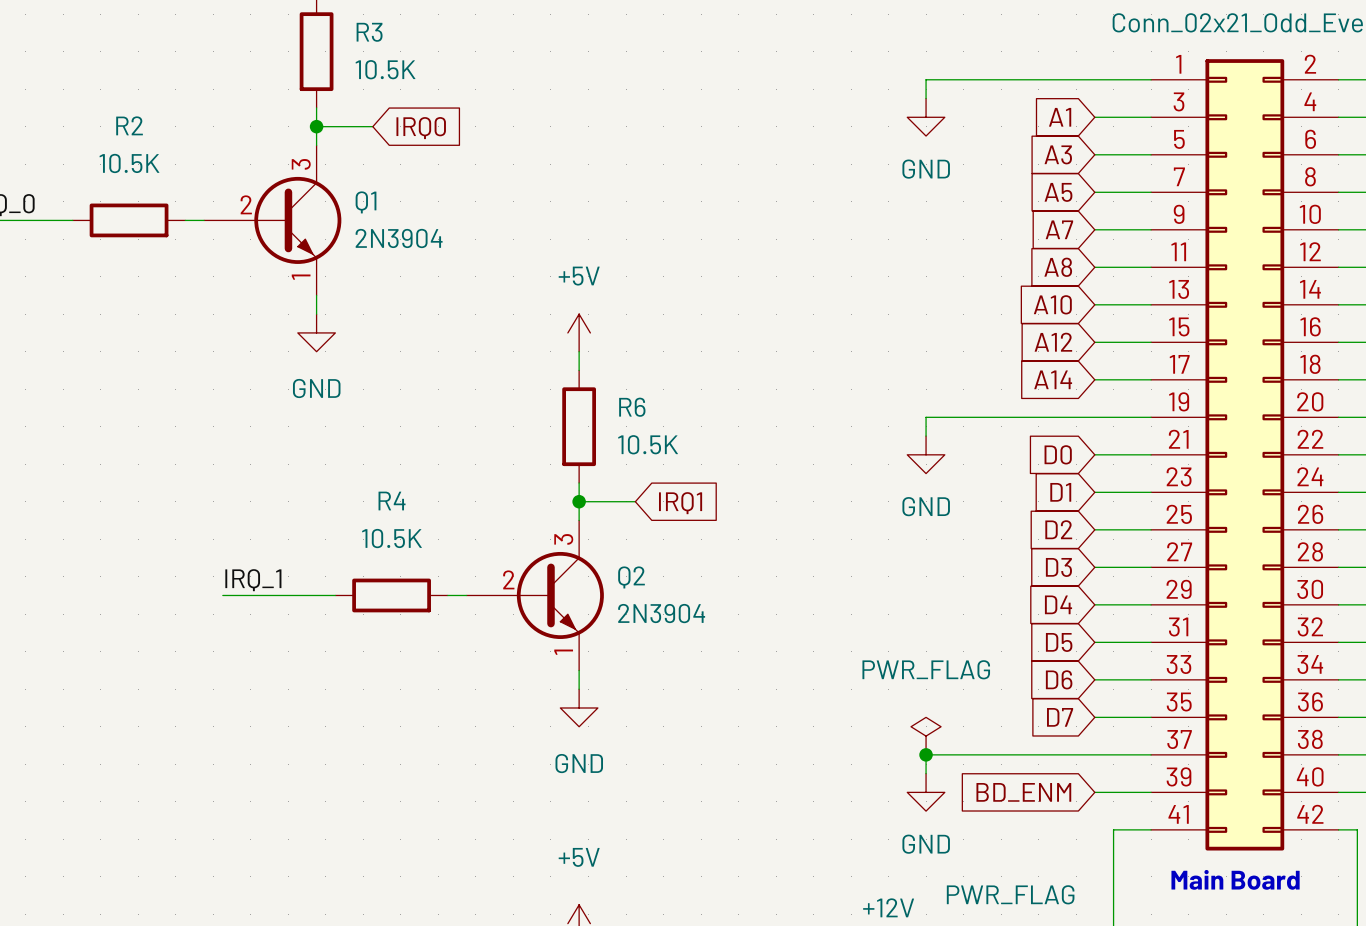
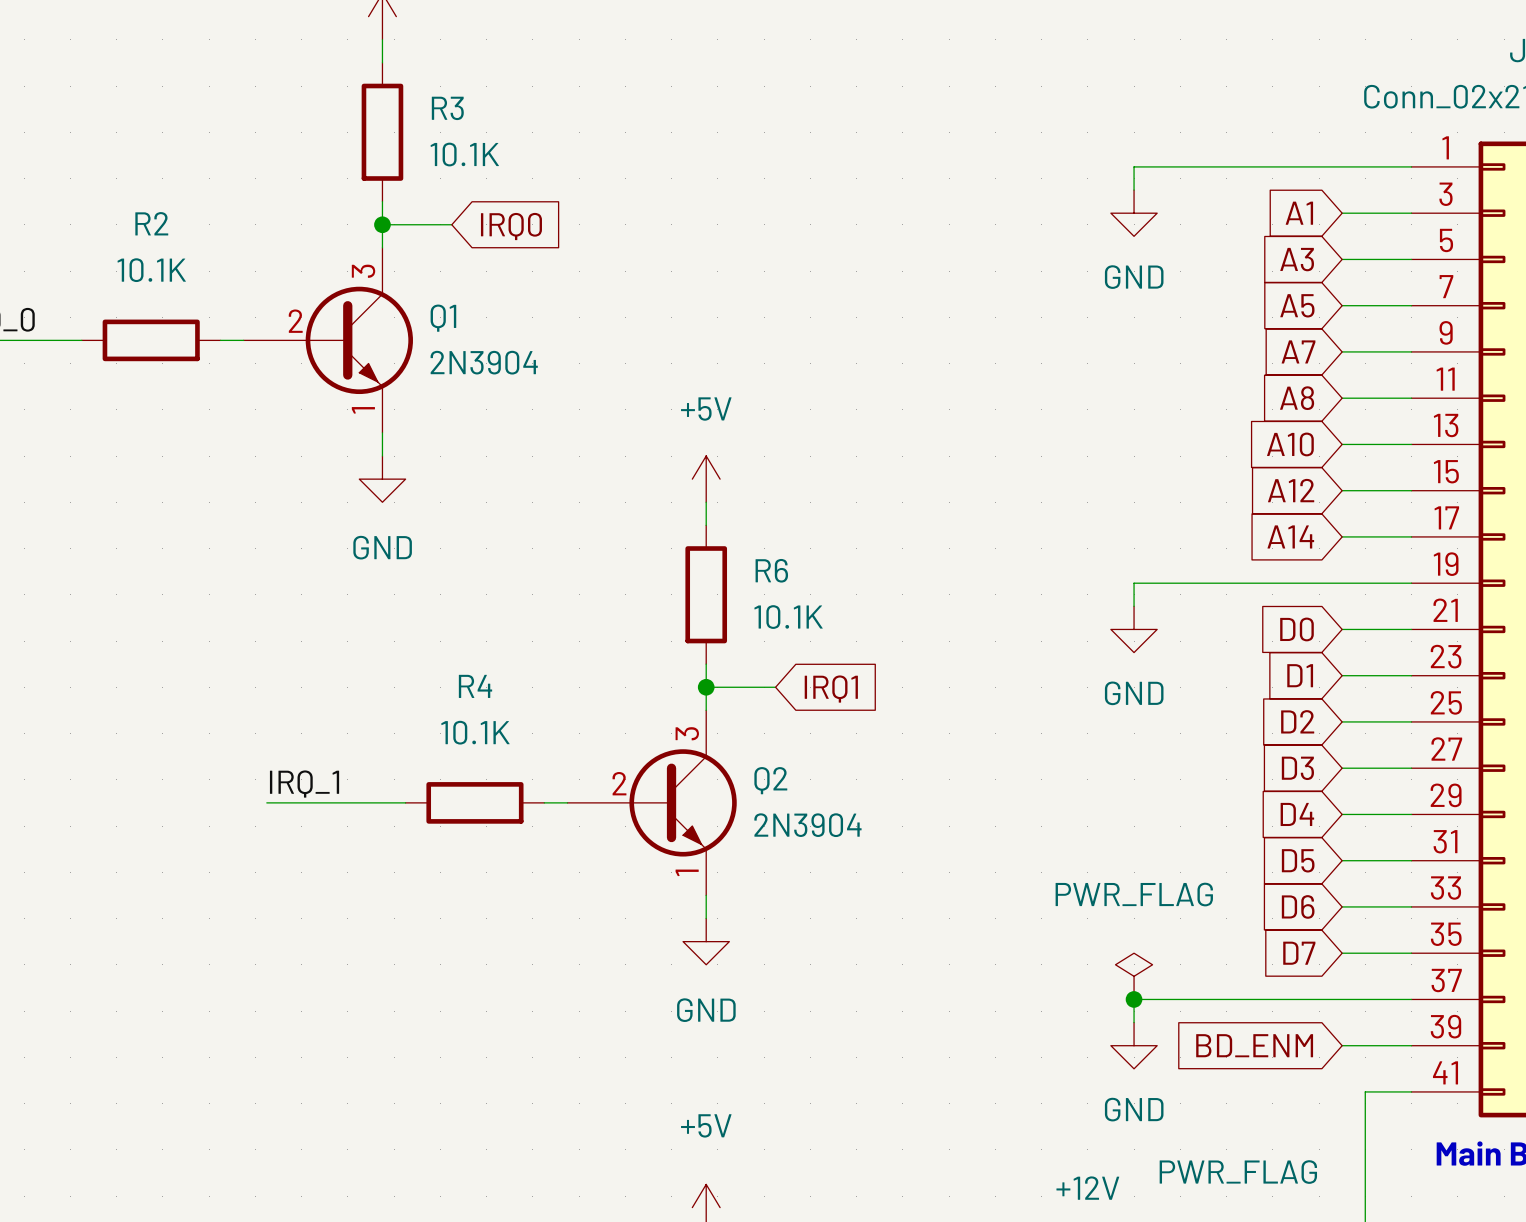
R3 value: 10.5K (385, 69) -> 10.1K (464, 154)
R2 value: 10.5K (129, 163) -> 10.1K (151, 270)
R6 value: 10.5K (648, 444) -> 10.1K (788, 617)
R4 value: 10.5K (392, 538) -> 10.1K (475, 732)

